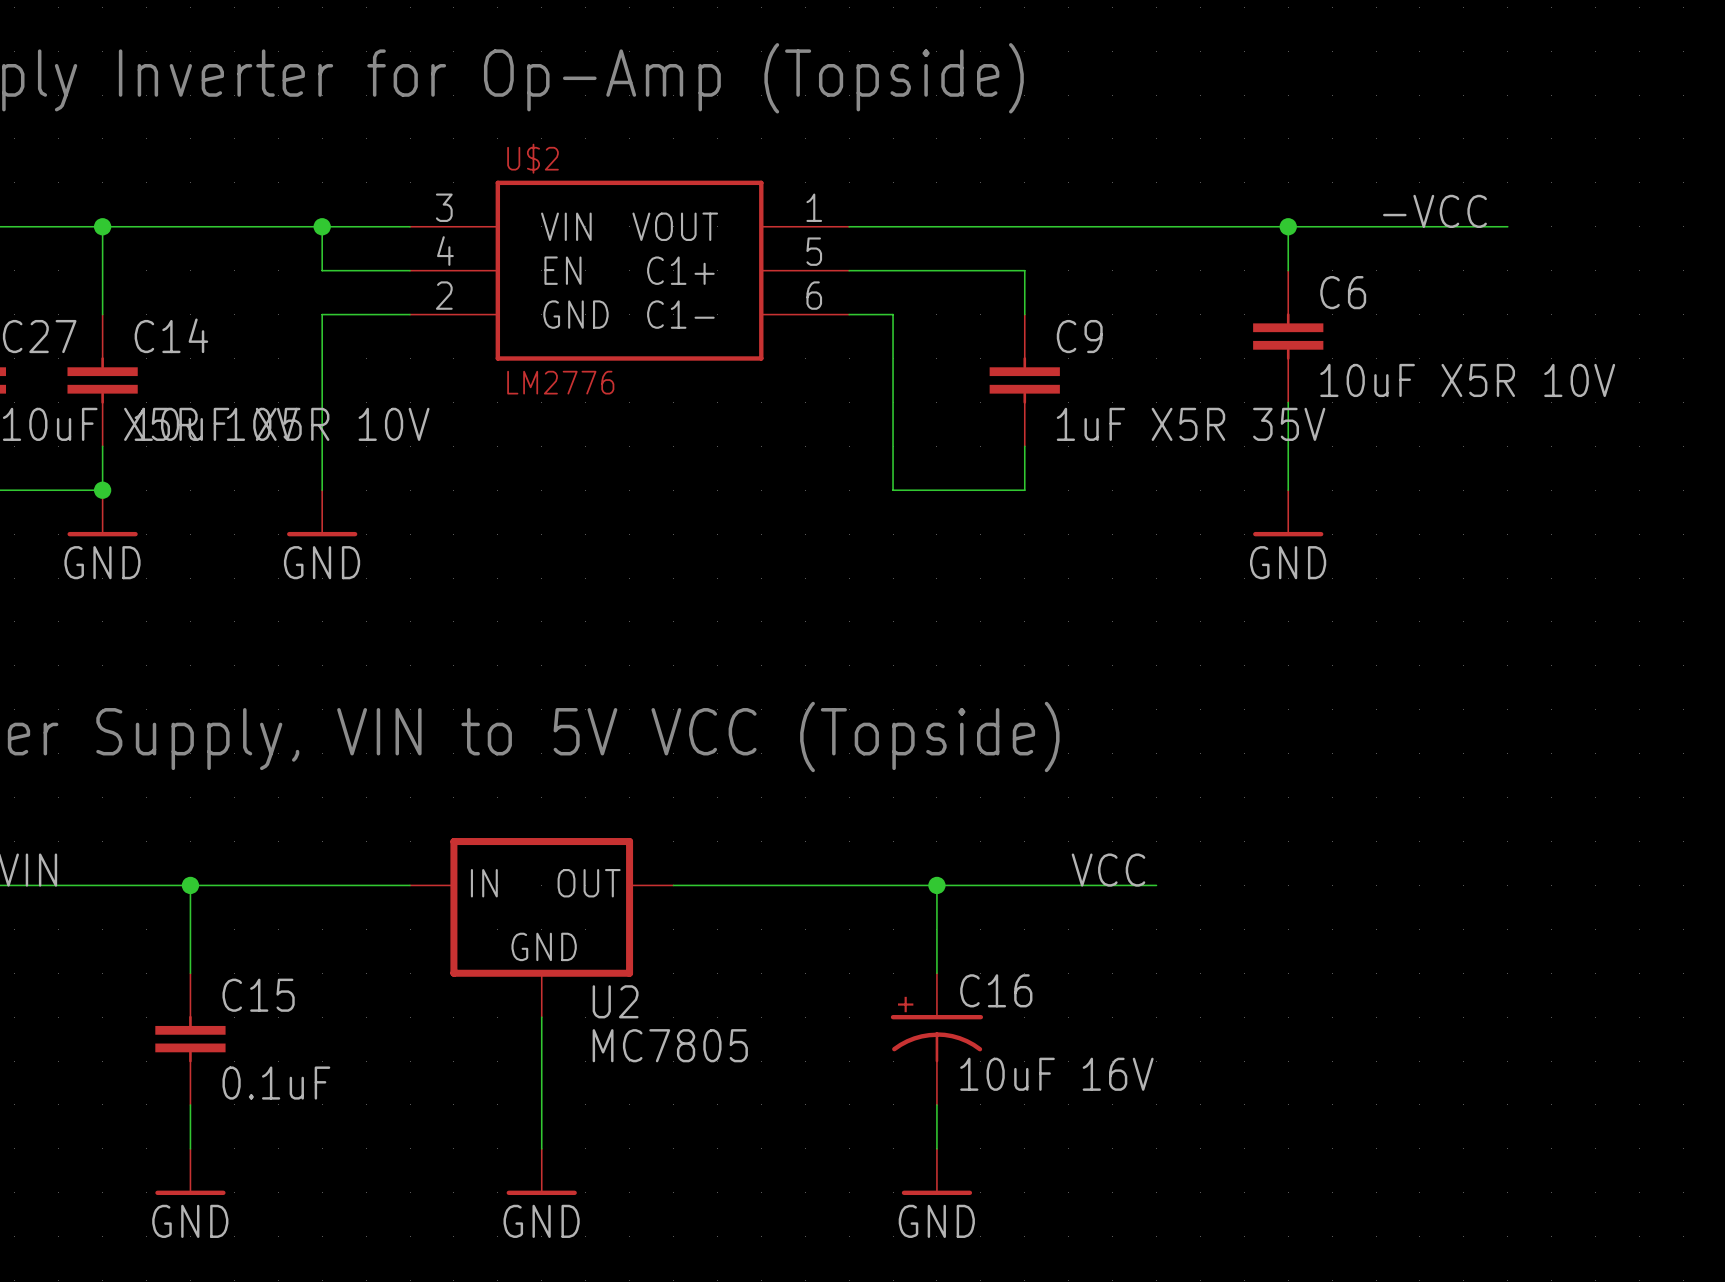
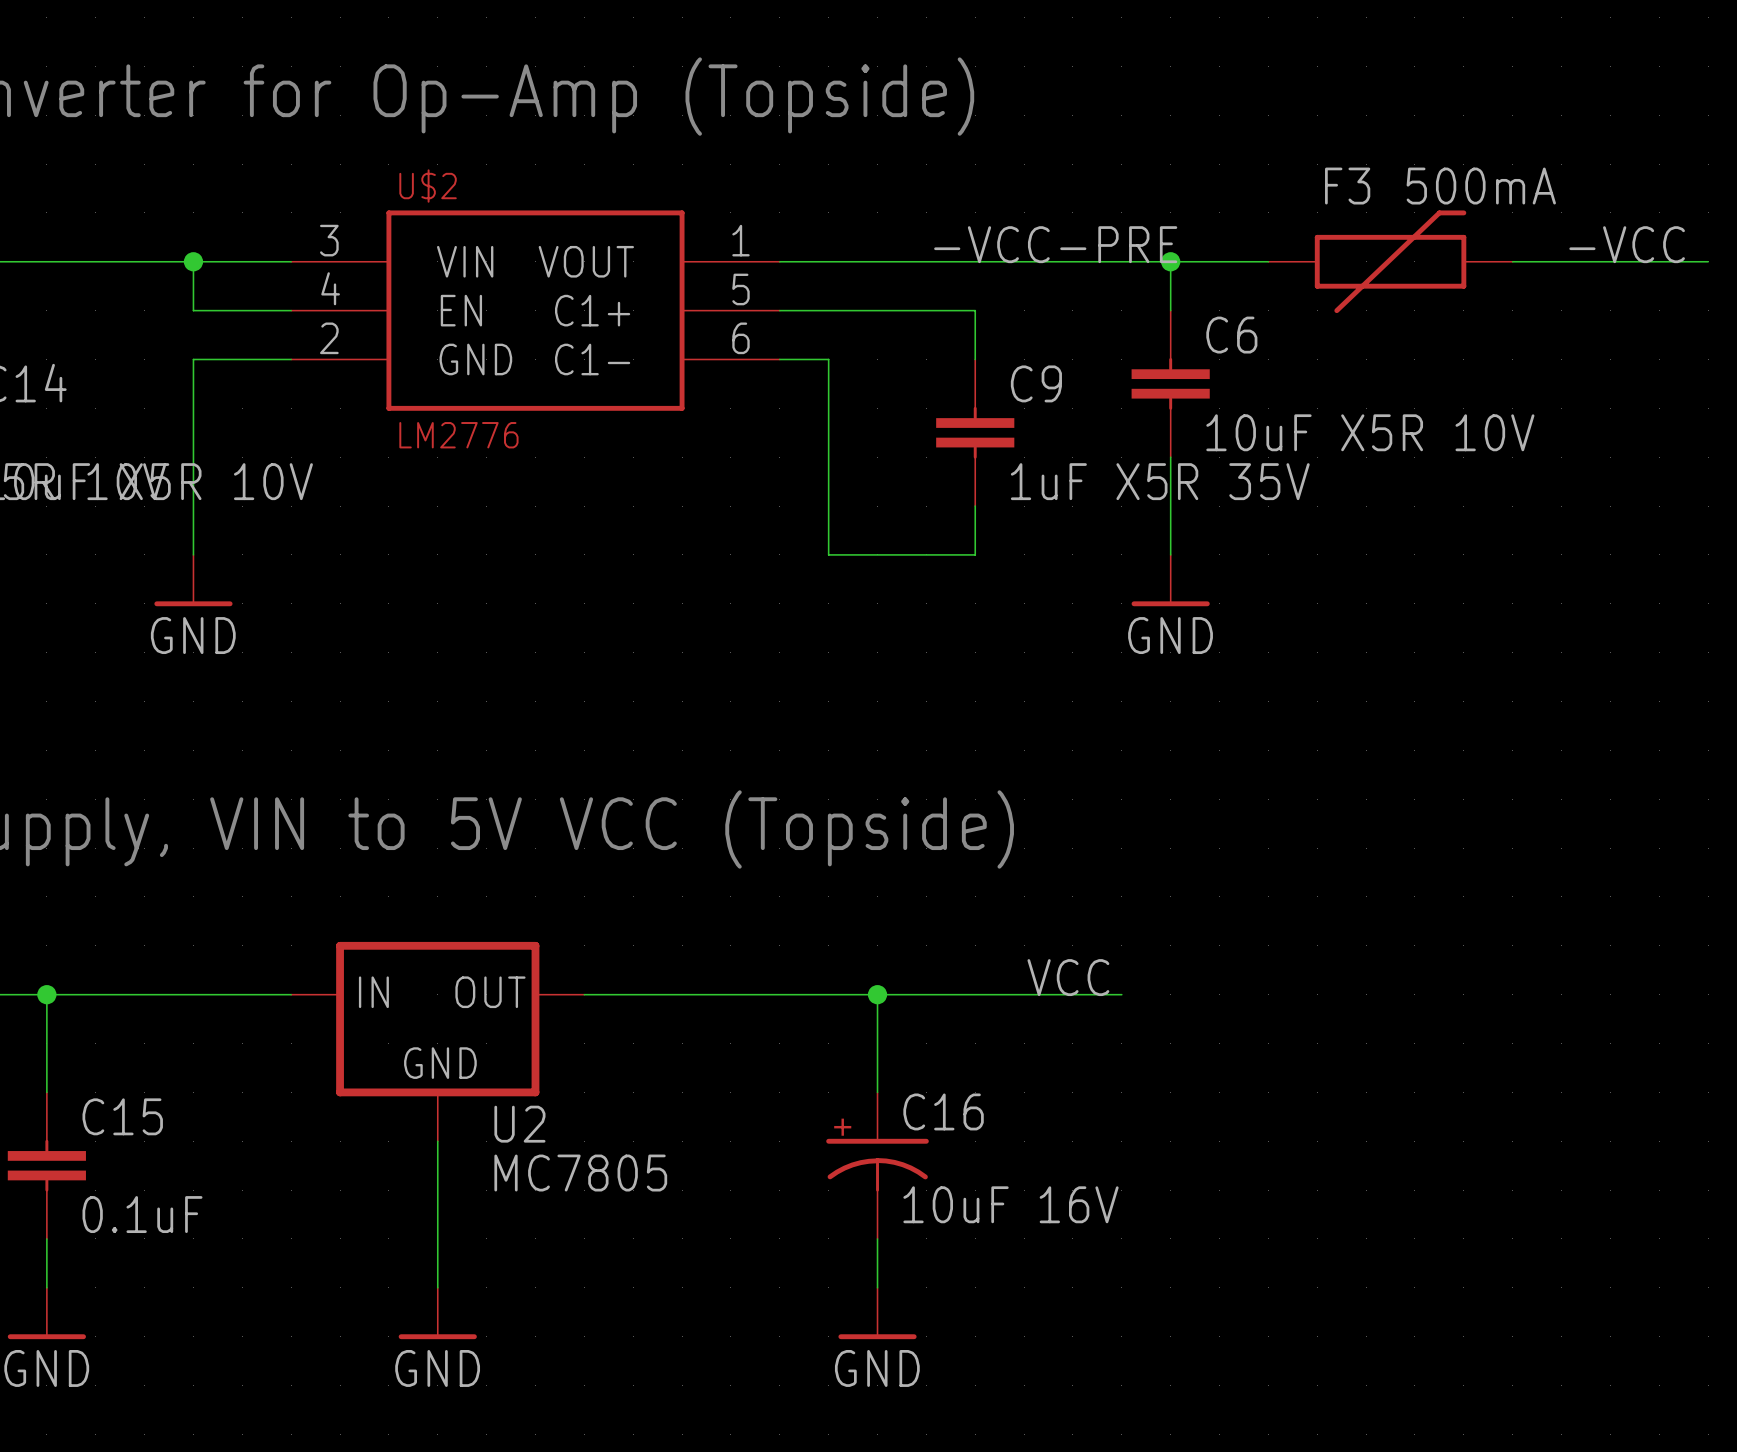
label: none -> -VCC-PRE (1055, 244)
label position: -VCC (1434, 211) -> -VCC (1627, 244)
wire: none -> (1170, 261) (1170, 310)
junction position: (1288, 226) -> (1170, 261)
F3: none -> 500mA (1390, 261)
wire: (1507, 226) (1288, 226) (1288, 270) -> (1512, 261) (1708, 261)
C6 position: (1288, 336) -> (1170, 383)
wire: (1288, 402) (1288, 490) -> (1170, 457) (1170, 554)
power symbol position: GND (1288, 513) -> GND (1170, 580)

